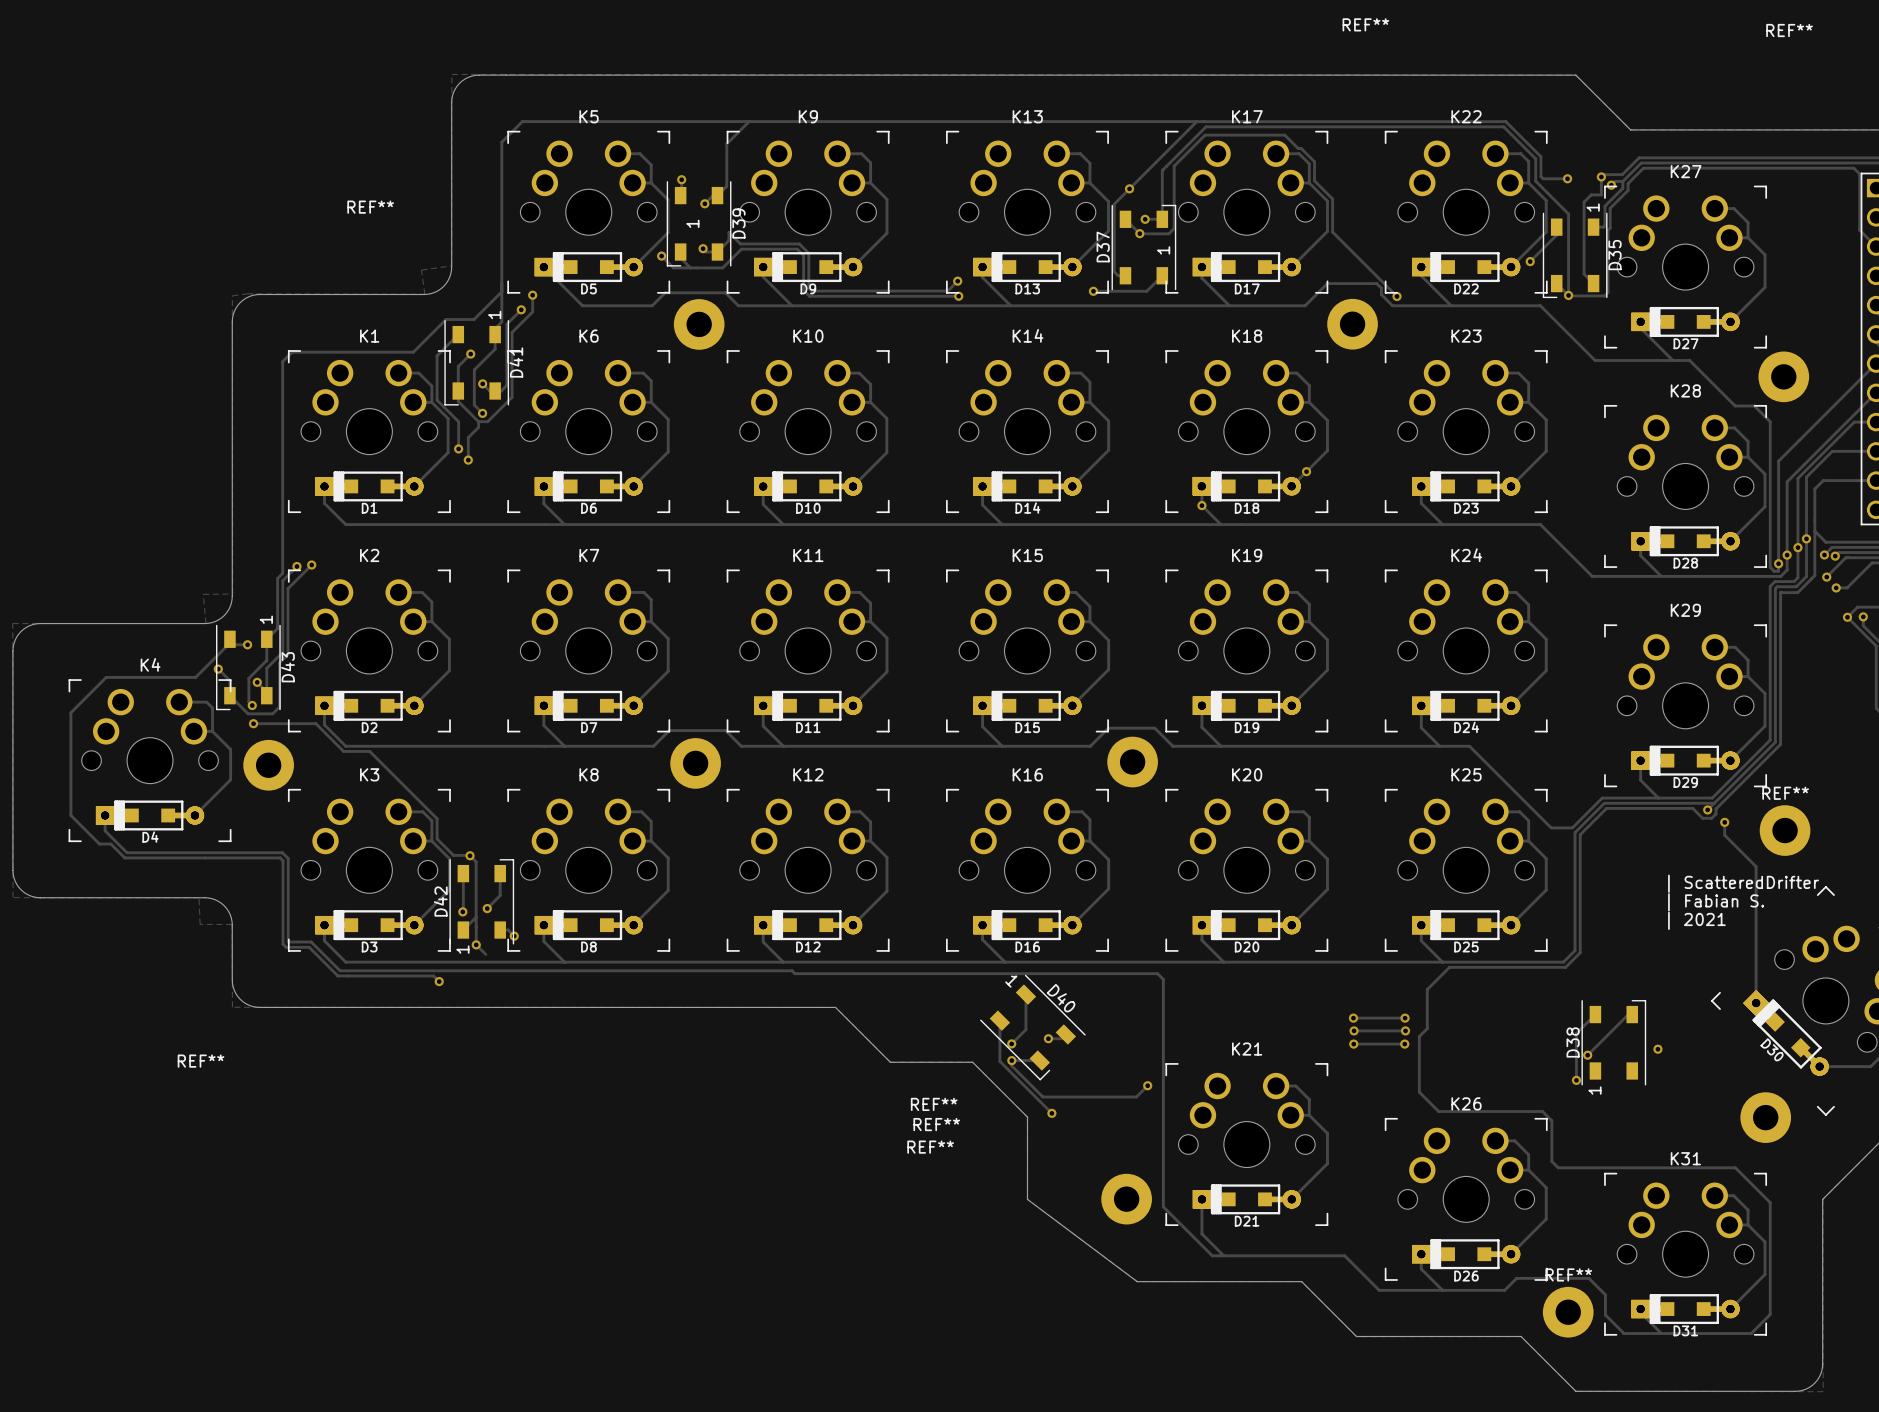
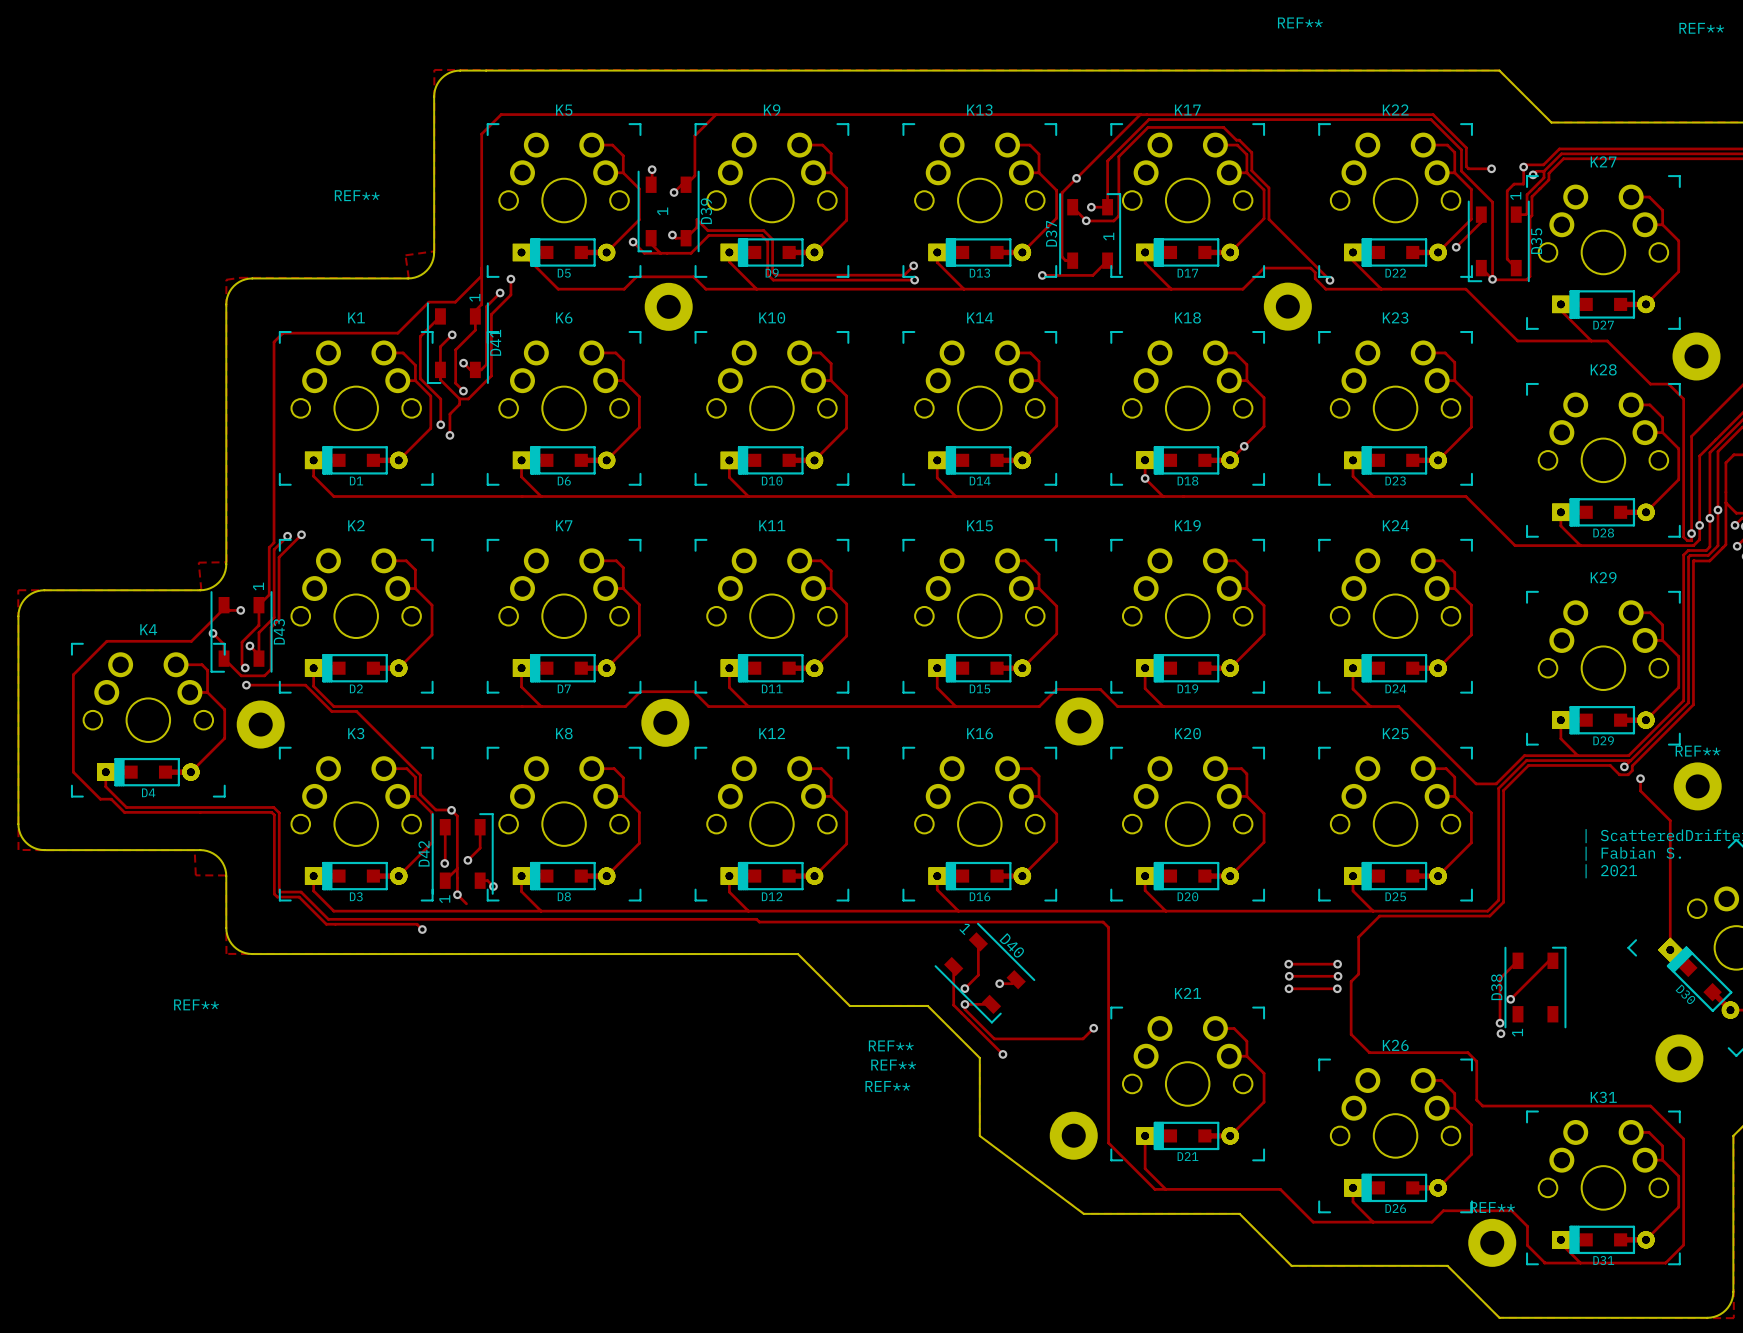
via: (1657, 1049) -> none
via: none -> (1500, 1033)

